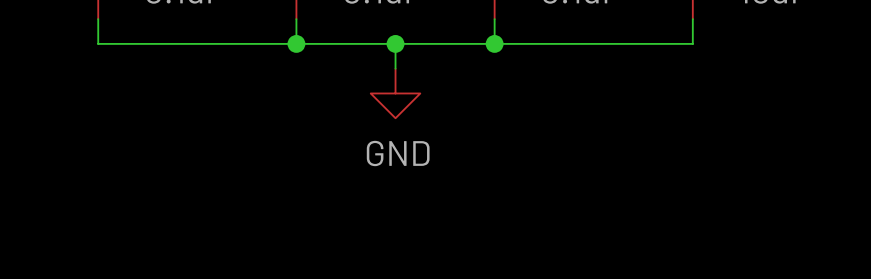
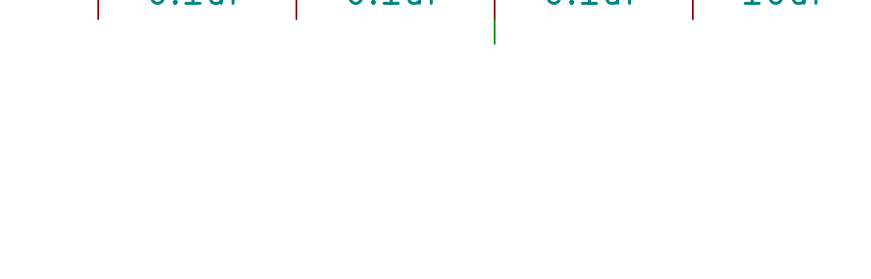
wire: (98, 19) (98, 43) (692, 43) (692, 19) -> none
wire: (296, 19) (296, 43) -> none
junction: (296, 43) -> none
wire: (395, 43) (395, 68) -> none
junction: (395, 43) -> none
junction: (494, 43) -> none
power symbol: GND (395, 93) -> none

